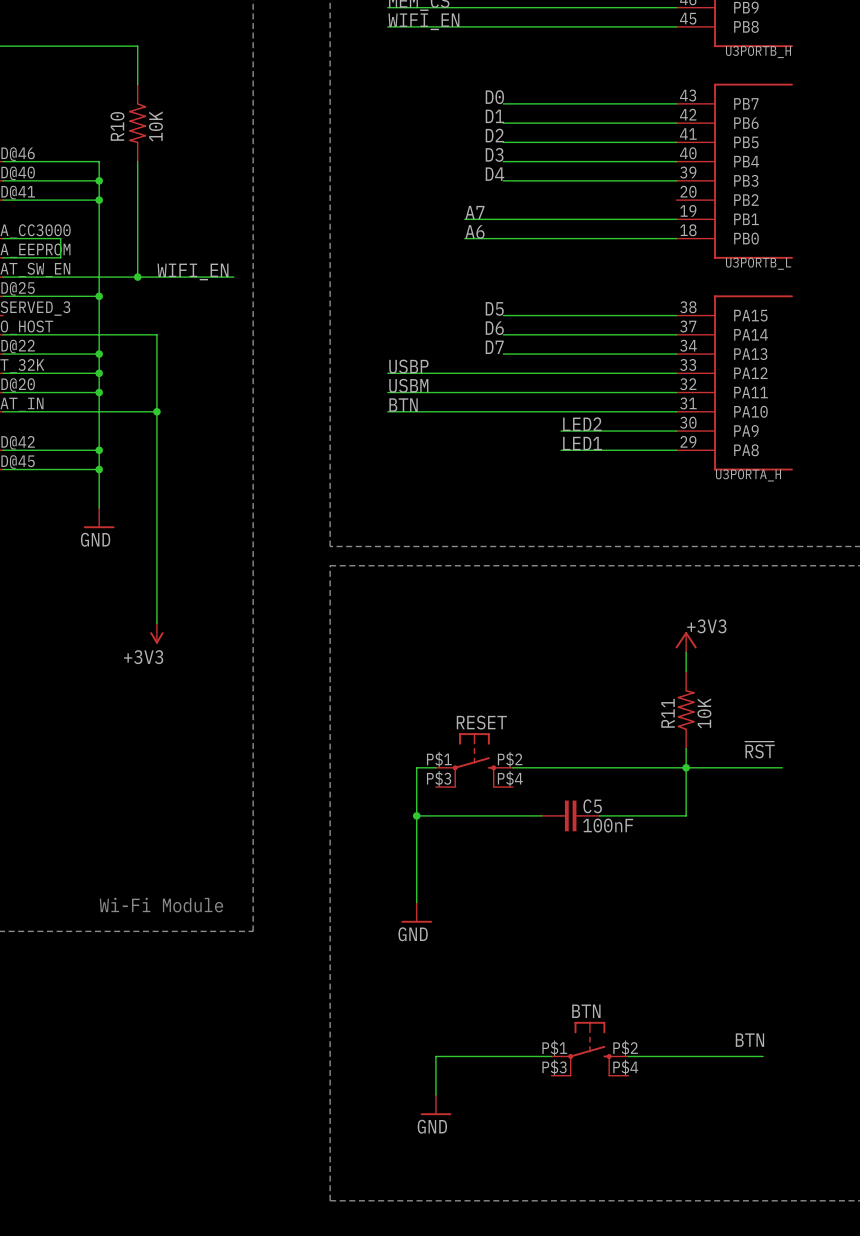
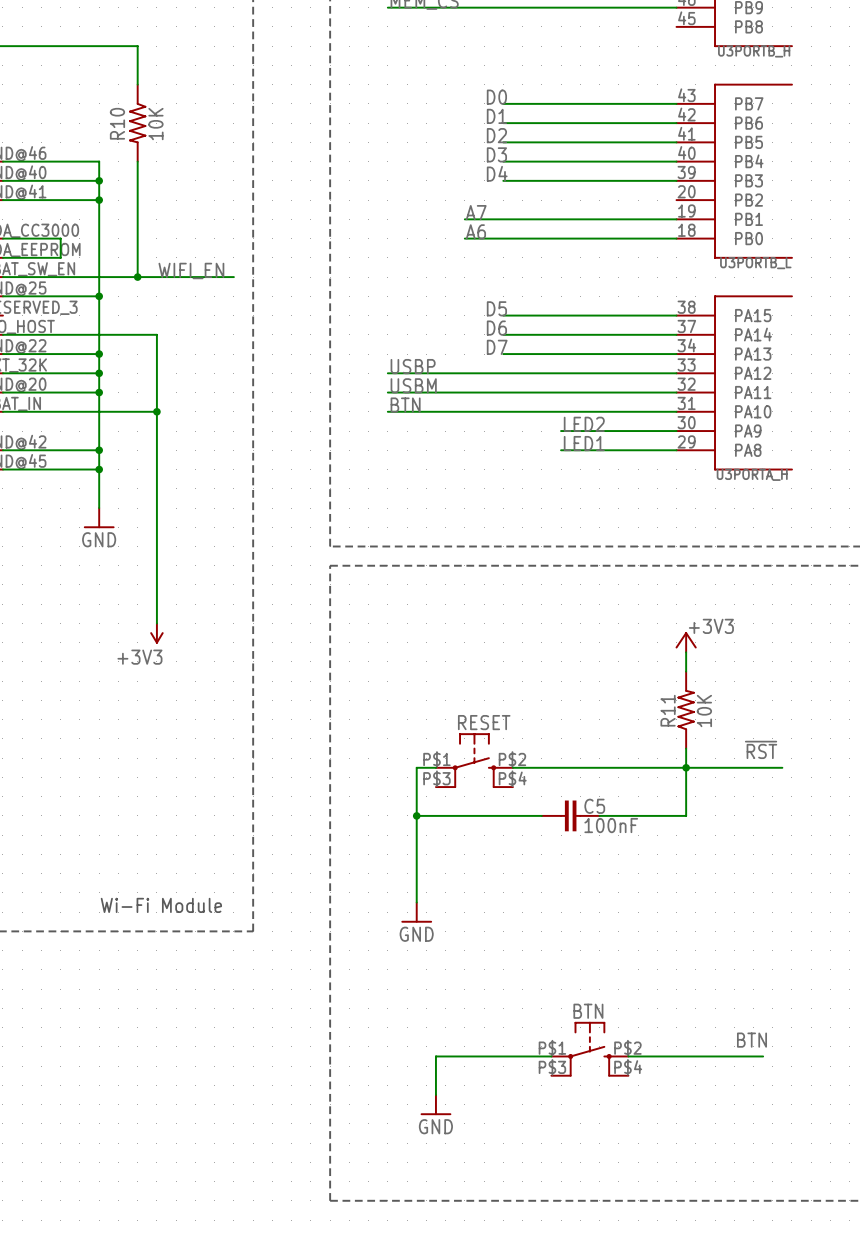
label: WIFI_EN (423, 21) -> none
wire: (387, 26) (676, 26) -> none

